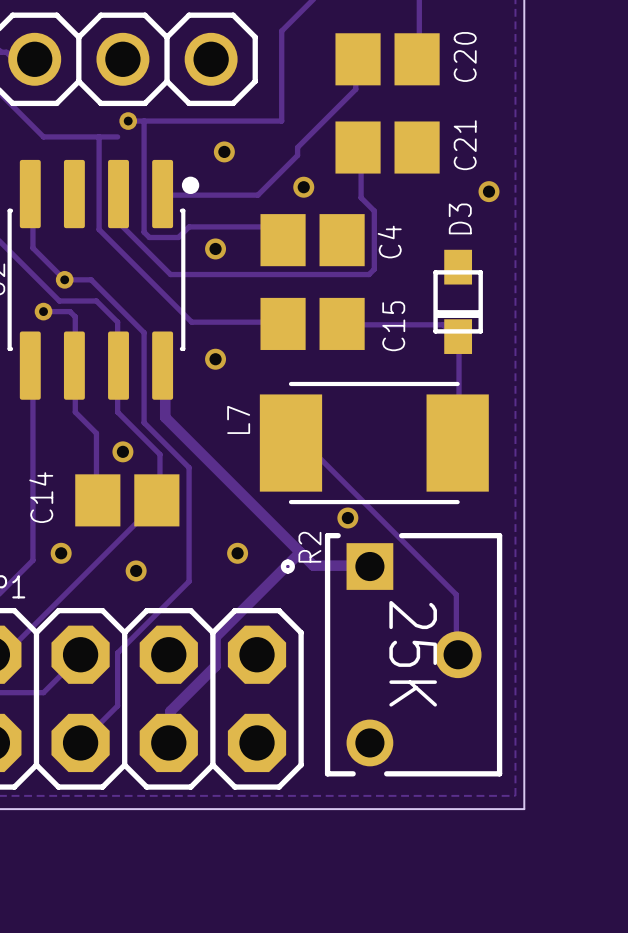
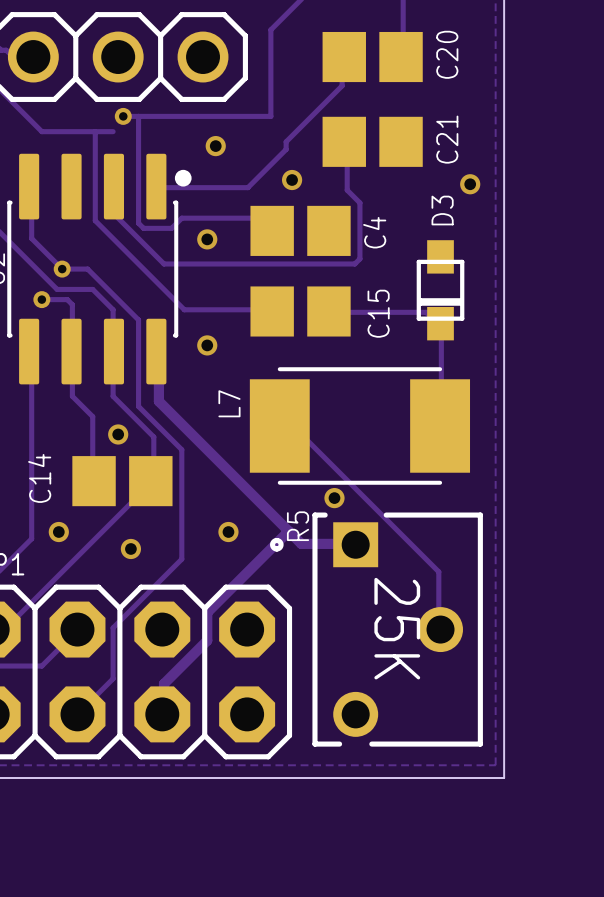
R2 name: R2 (309, 547) -> R5 (298, 526)

